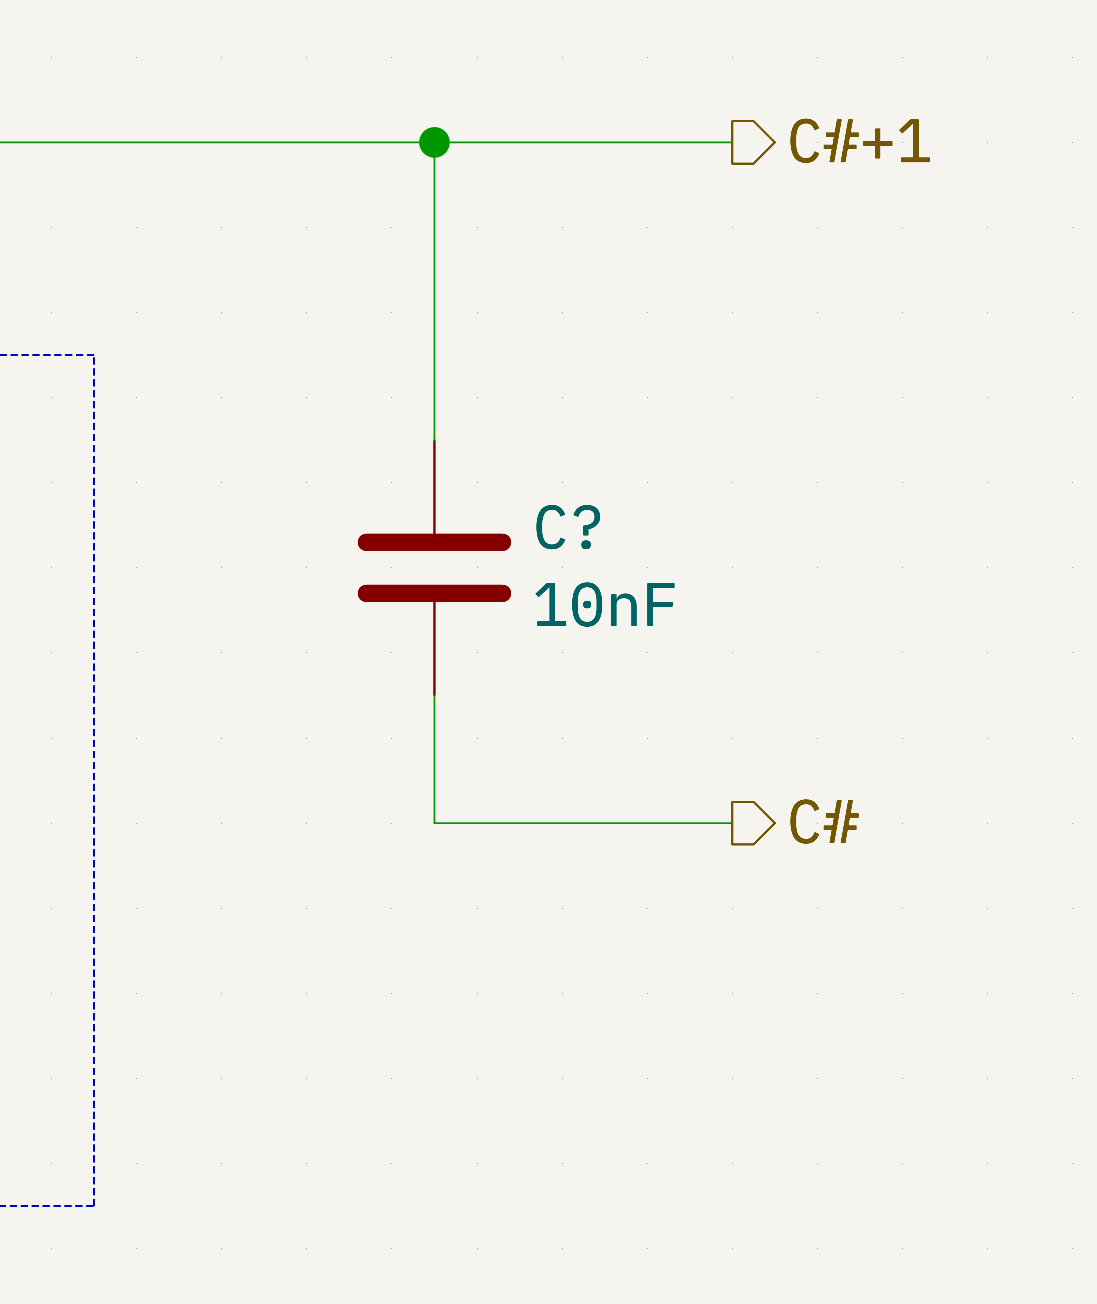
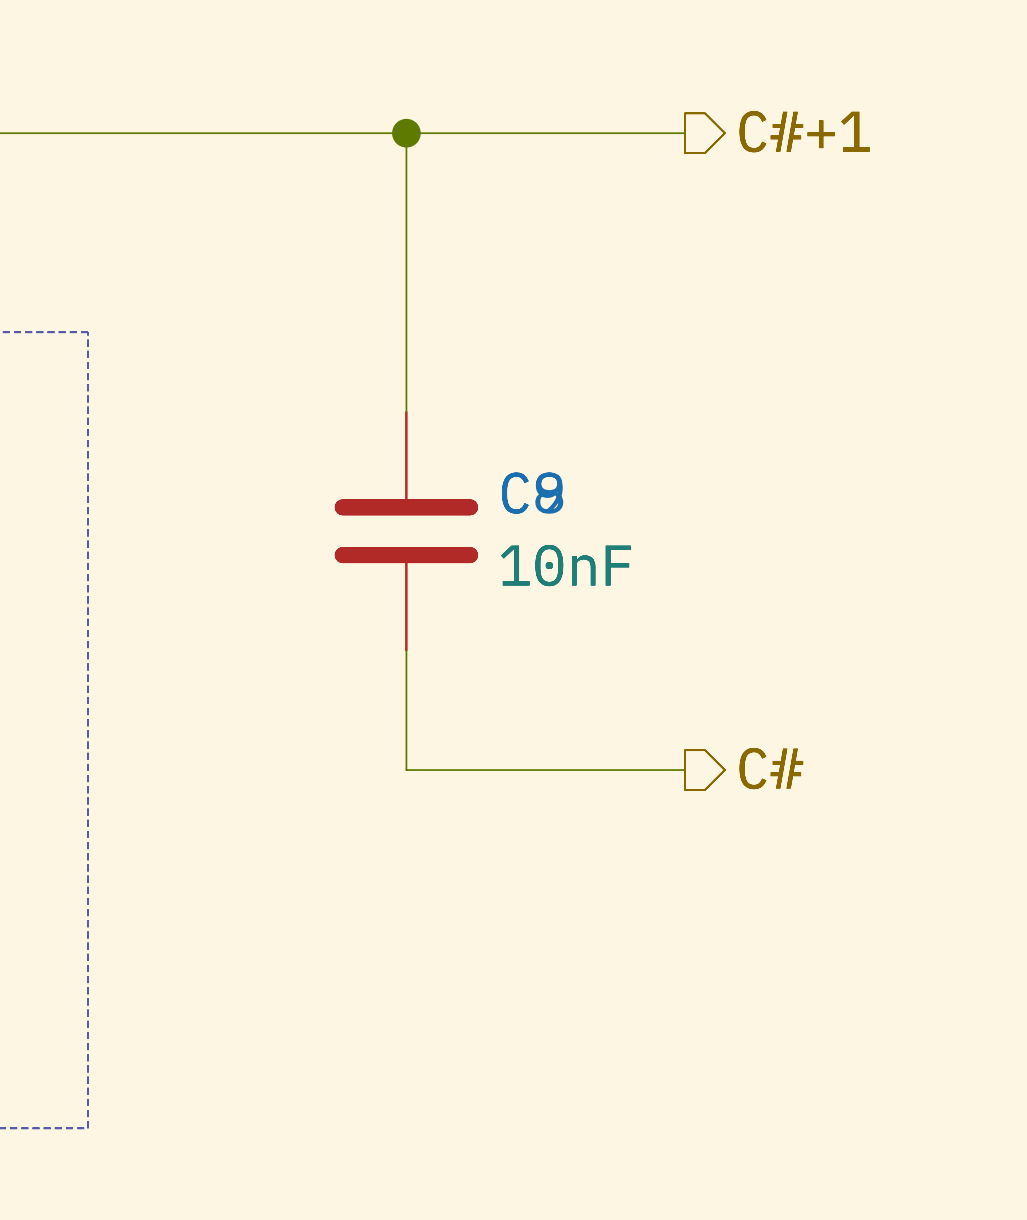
C?: 10nF (434, 567) -> none
part: none -> 10nF (406, 531)
part: none -> 10nF (406, 531)

